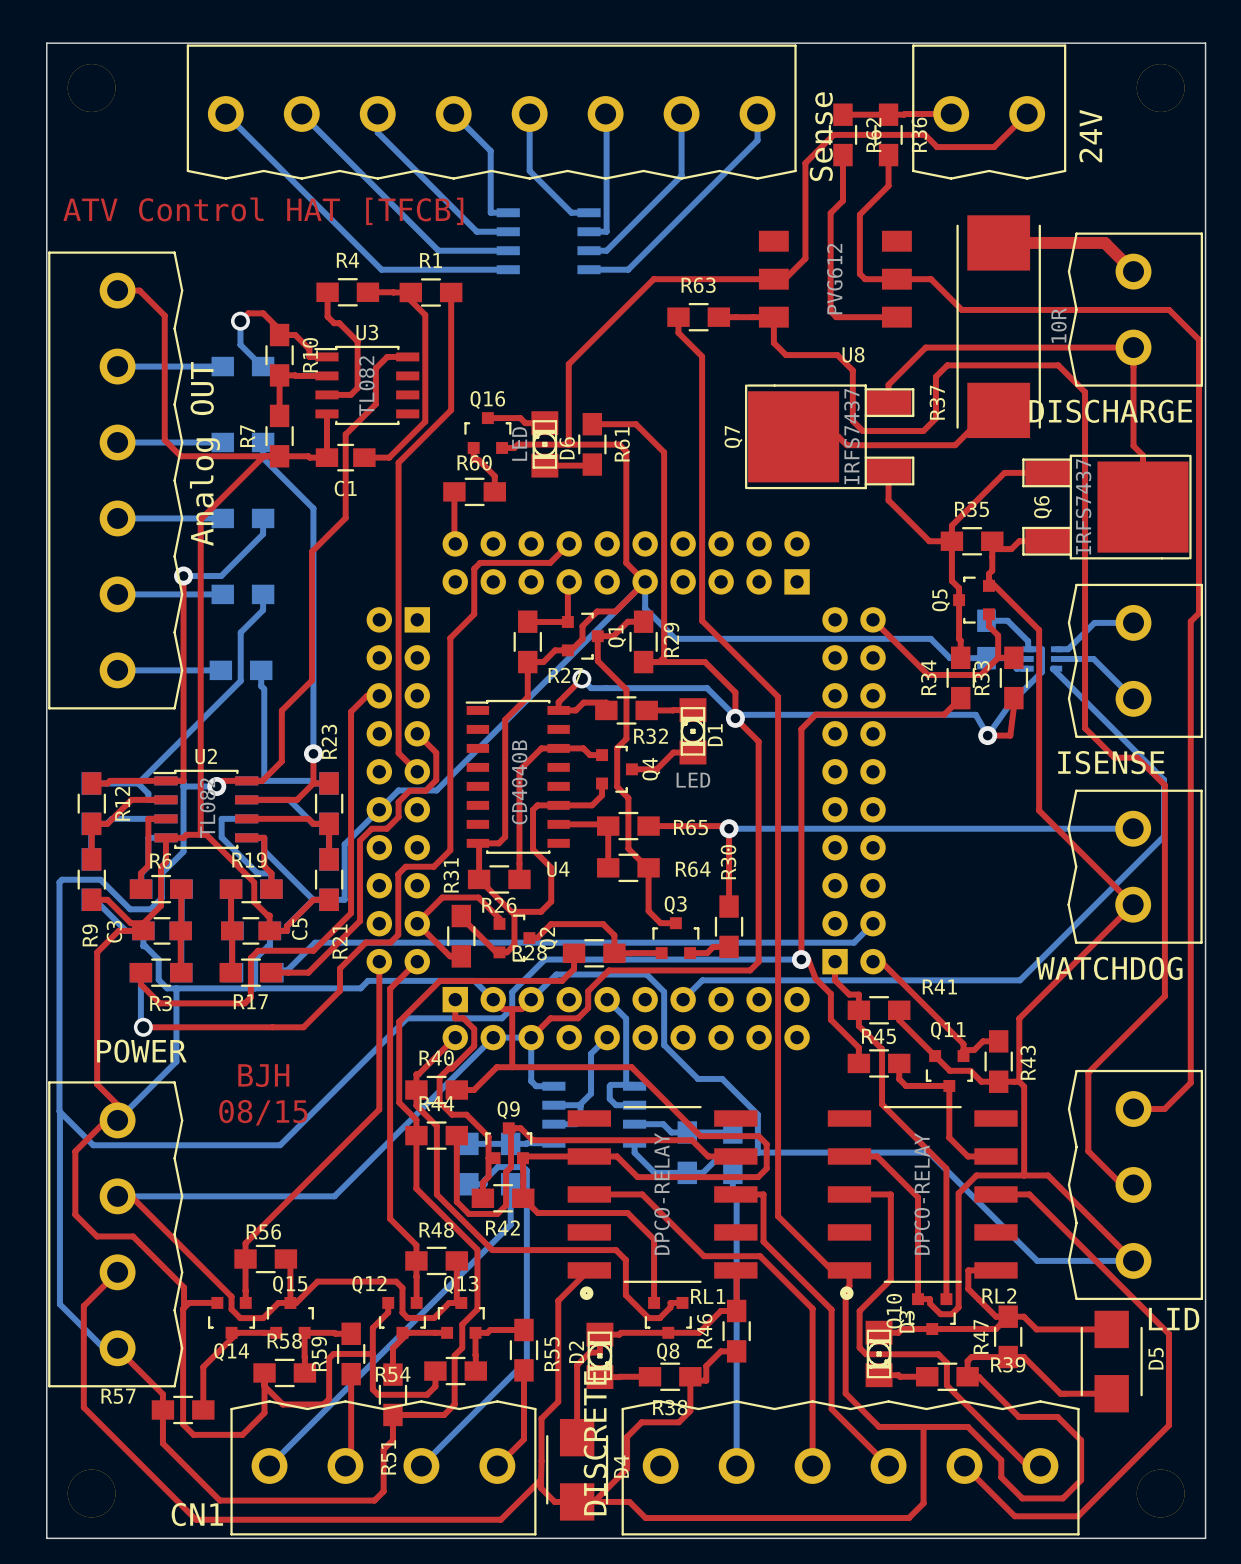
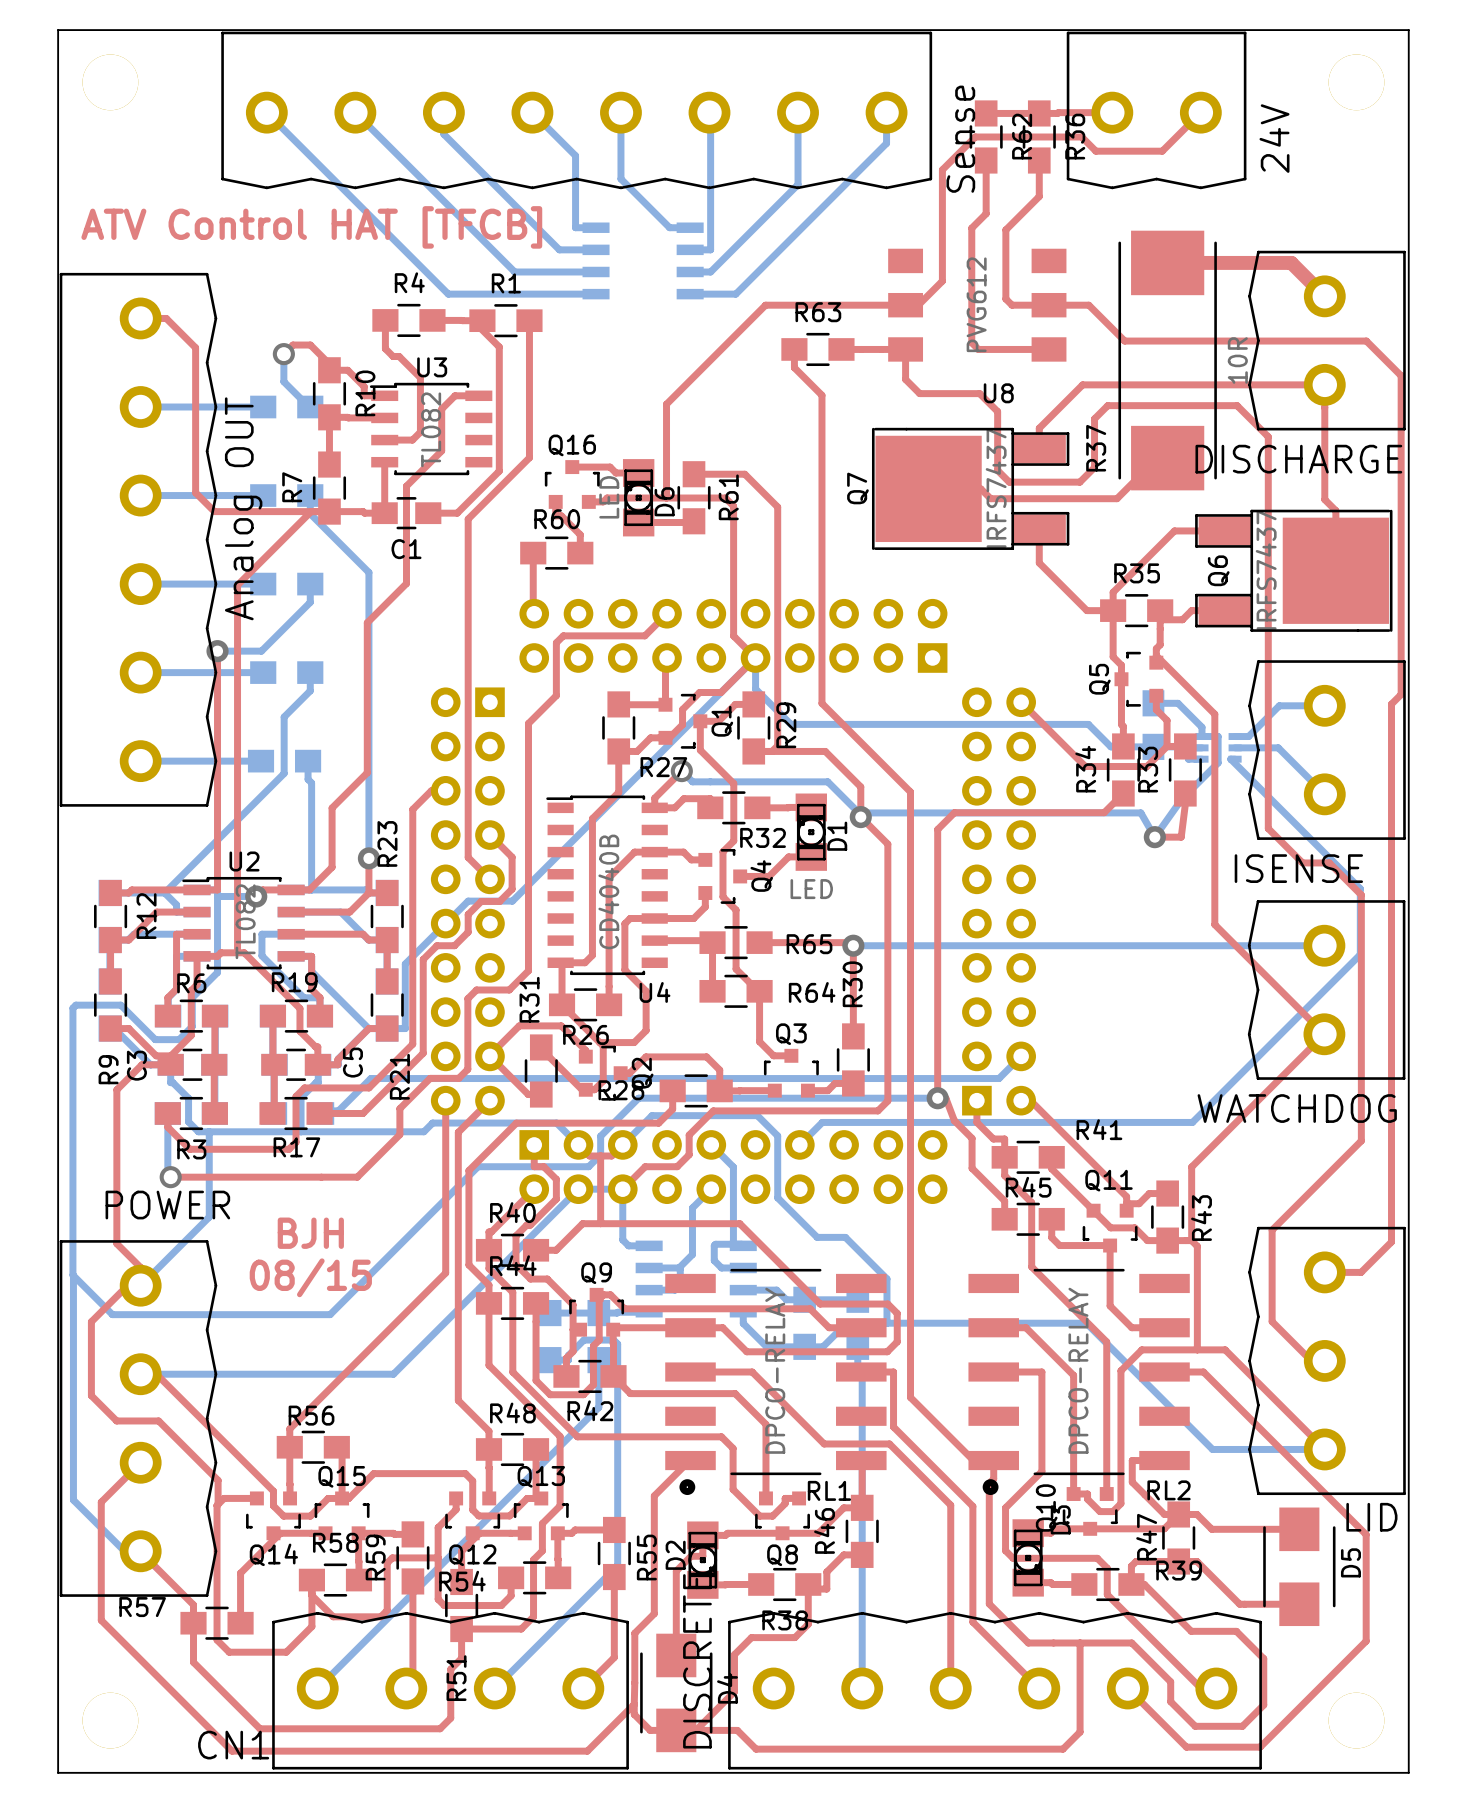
Q12 name position: Q12 (369, 1284) -> Q12 (472, 1555)

